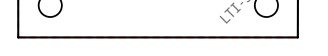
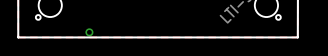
hole: none -> (38, 17)
hole: none -> (278, 17)
via: none -> (89, 32)

